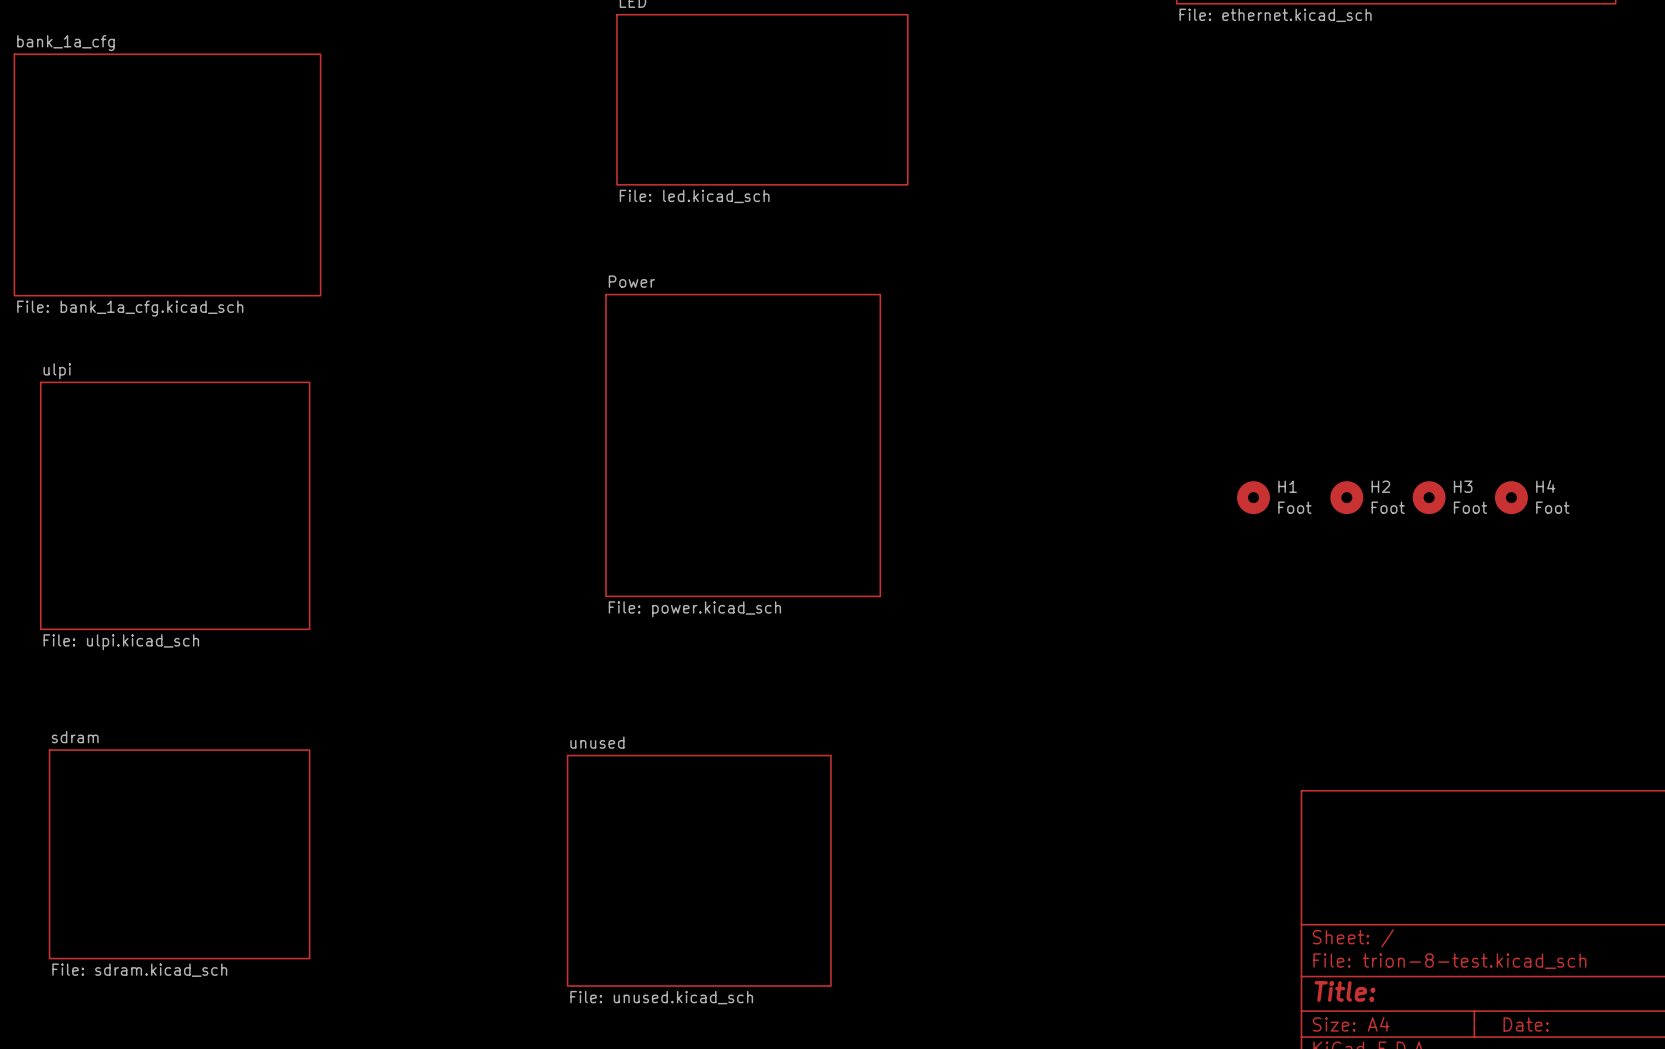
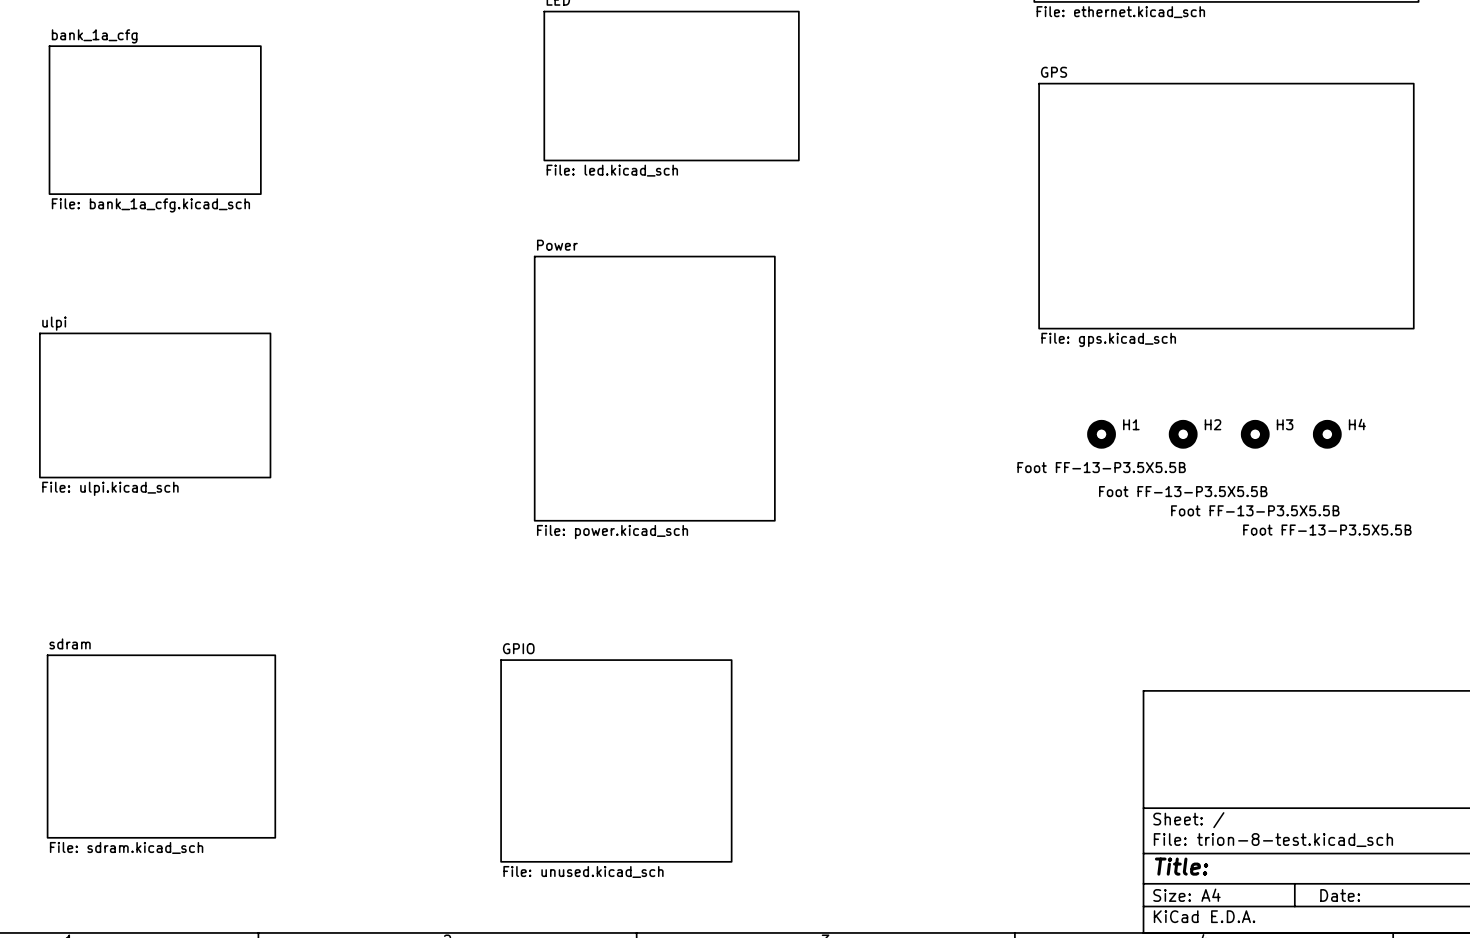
sheet bank_1a_cfg name position: bank_1a_cfg (65, 43) -> bank_1a_cfg (94, 36)
sheet bank_1a_cfg shape: [13, 53, 322, 297] -> [48, 45, 262, 195]
sheet GPS: none -> File: gps.kicad_sch (1226, 206)
sheet bank_1a_cfg value position: File: bank_1a_cfg.kicad_sch (130, 308) -> File: bank_1a_cfg.kicad_sch (150, 205)
sheet ulpi: none -> File: ulpi.kicad_sch (155, 405)
sheet ulpi: File: ulpi.kicad_sch (175, 505) -> none
H1 value: Foot (1294, 507) -> Foot FF-13-P3.5X5.5B (1101, 467)
H2 value: Foot (1388, 507) -> Foot FF-13-P3.5X5.5B (1183, 491)
H3 value: Foot (1470, 507) -> Foot FF-13-P3.5X5.5B (1255, 510)
H4 value: Foot (1552, 507) -> Foot FF-13-P3.5X5.5B (1327, 530)
sheet unused name: unused (597, 742) -> GPIO (518, 648)

